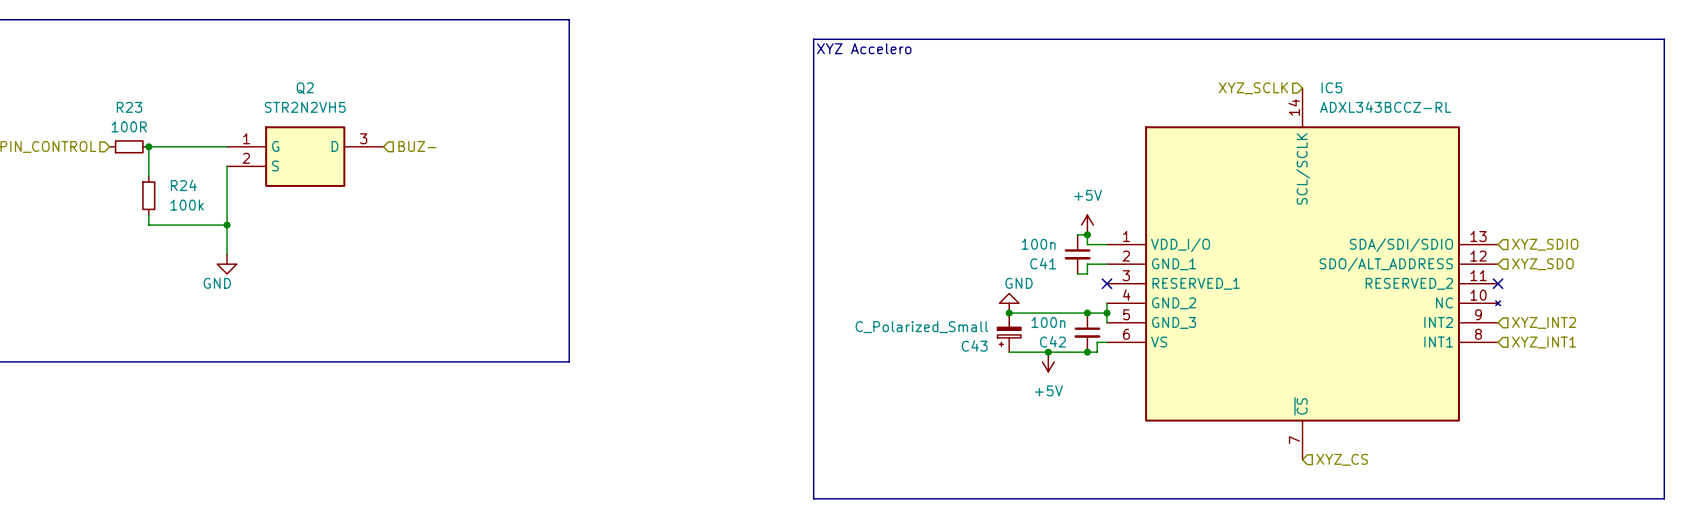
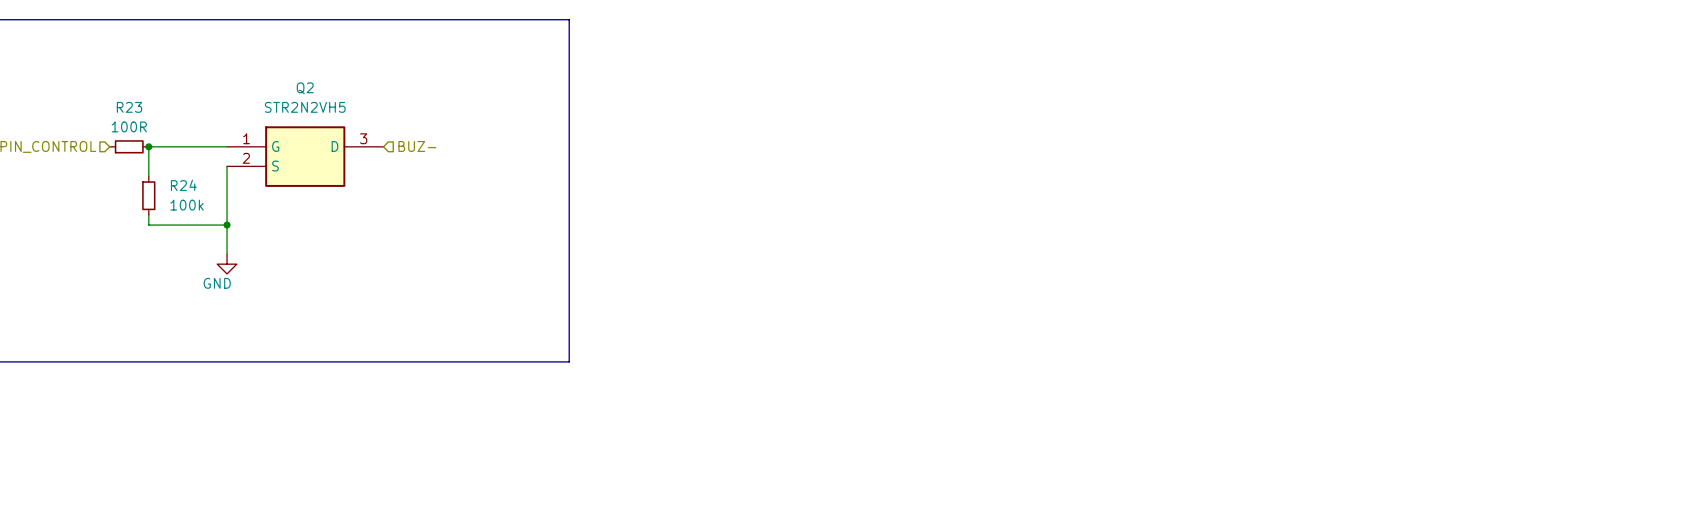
line: (813, 39) (1664, 39) (1664, 498) (813, 498) (813, 39) -> none
text: XYZ Accelero (864, 48) -> none
hierarchical label: XYZ_SCLK (1253, 88) -> none
power symbol: +5V (1087, 225) -> none
wire: (1077, 234) (1087, 234) (1087, 244) (1106, 244) -> none
junction: (1087, 234) -> none
hierarchical label: XYZ_SDIO (1545, 244) -> none
C41: 100n (1077, 254) -> none
wire: (1106, 264) (1087, 264) (1087, 273) (1077, 273) -> none
hierarchical label: XYZ_SDO (1542, 264) -> none
IC5: ADXL343BCCZ-RL (1303, 273) -> none
no-connect mark: (1106, 283) -> none
no-connect mark: (1498, 283) -> none
power symbol: GND (1009, 303) -> none
wire: (1106, 303) (1106, 322) -> none
wire: (1009, 313) (1106, 313) -> none
junction: (1009, 313) -> none
junction: (1087, 313) -> none
junction: (1106, 313) -> none
hierarchical label: XYZ_INT2 (1544, 322) -> none
C43: C_Polarized_Small (1009, 332) -> none
C42: 100n (1087, 332) -> none
wire: (1106, 342) (1097, 342) (1097, 352) (1009, 352) -> none
hierarchical label: XYZ_INT1 (1544, 342) -> none
junction: (1048, 352) -> none
junction: (1087, 352) -> none
power symbol: +5V (1048, 361) -> none
hierarchical label: XYZ_CS (1342, 459) -> none

